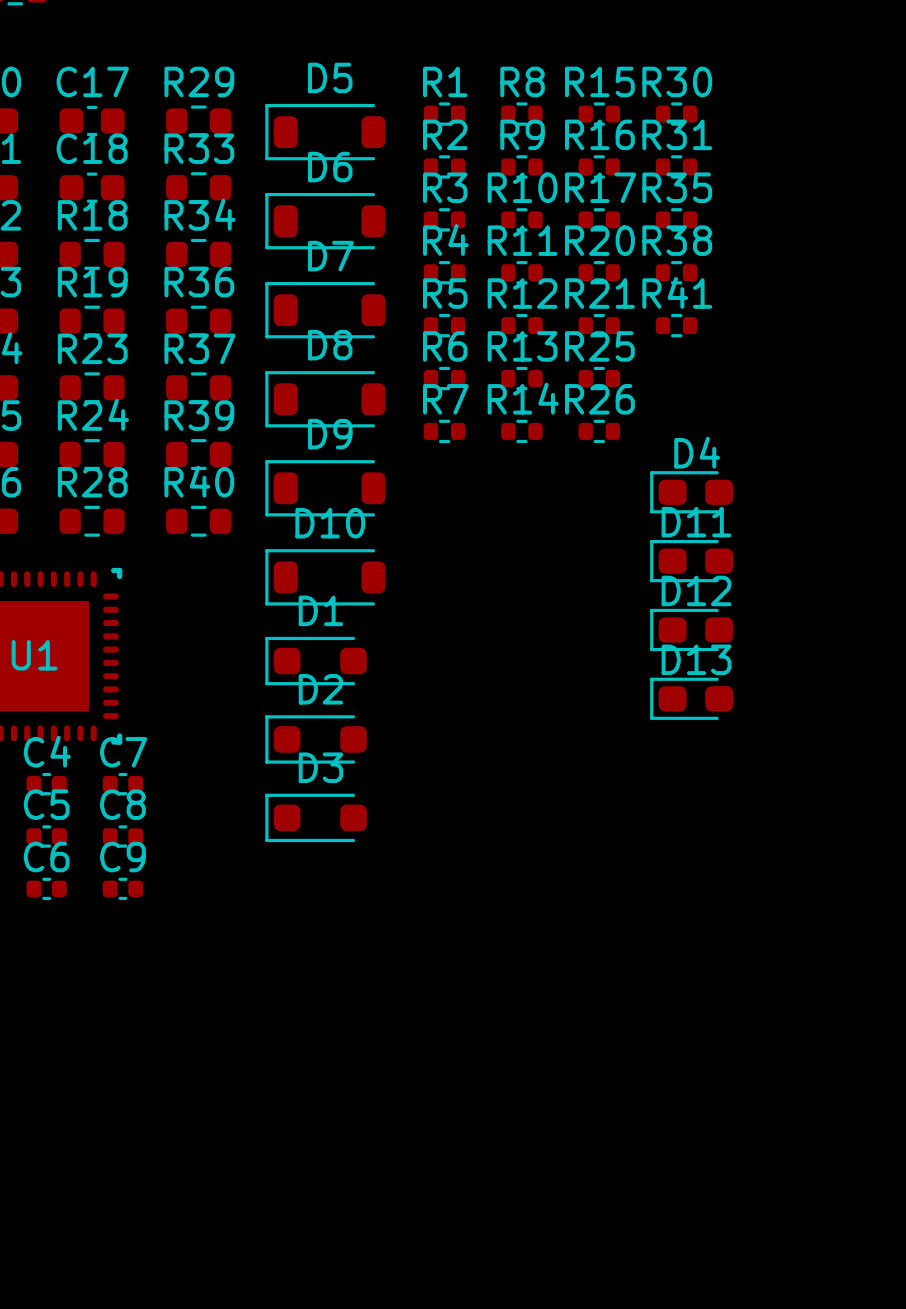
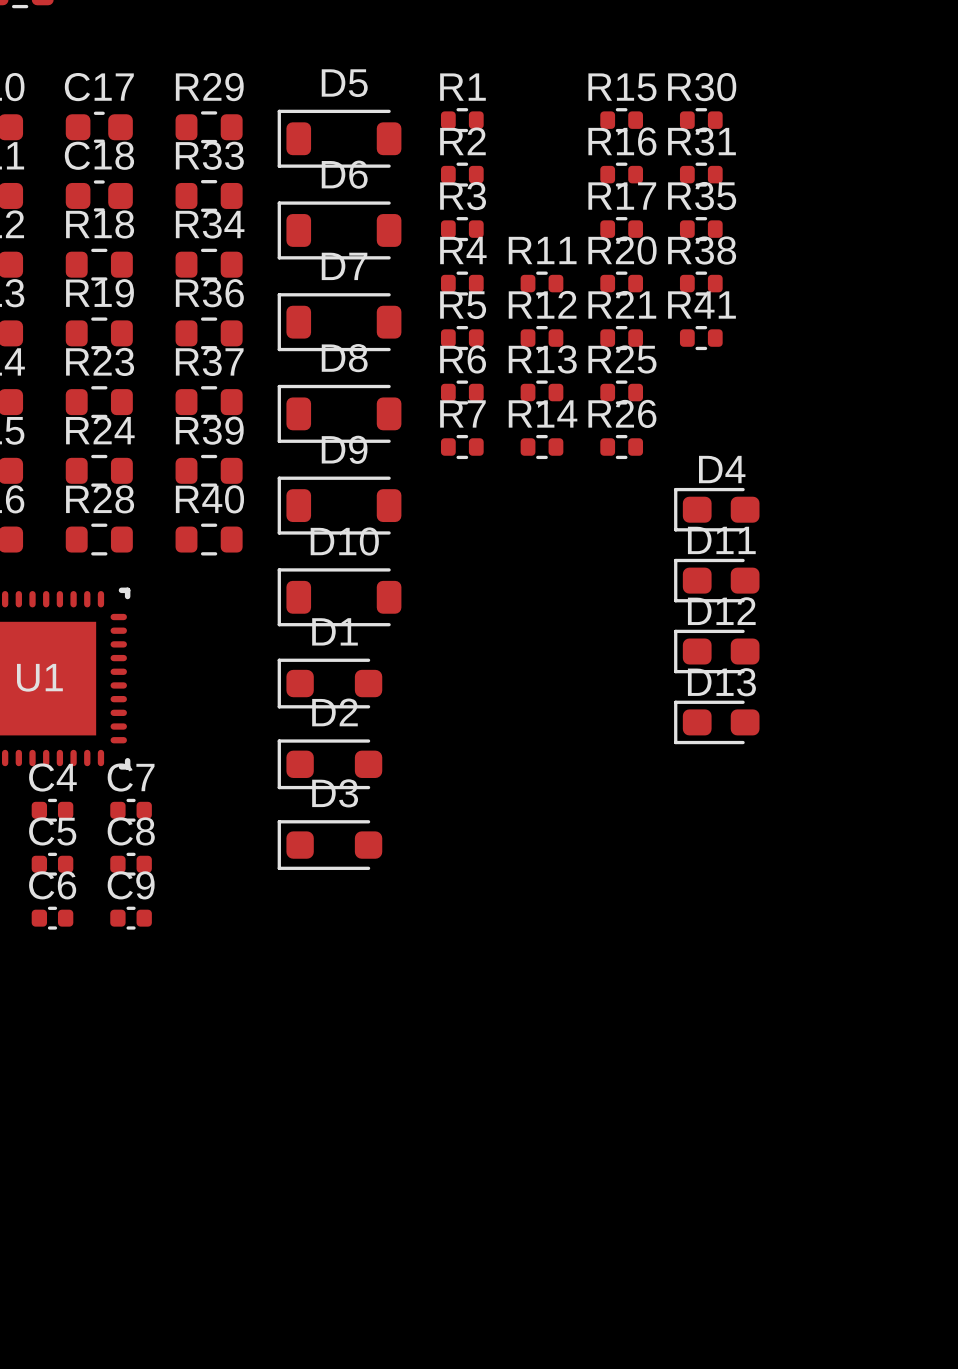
R8: (521, 114) -> none
R9: (521, 166) -> none
R10: (521, 219) -> none

